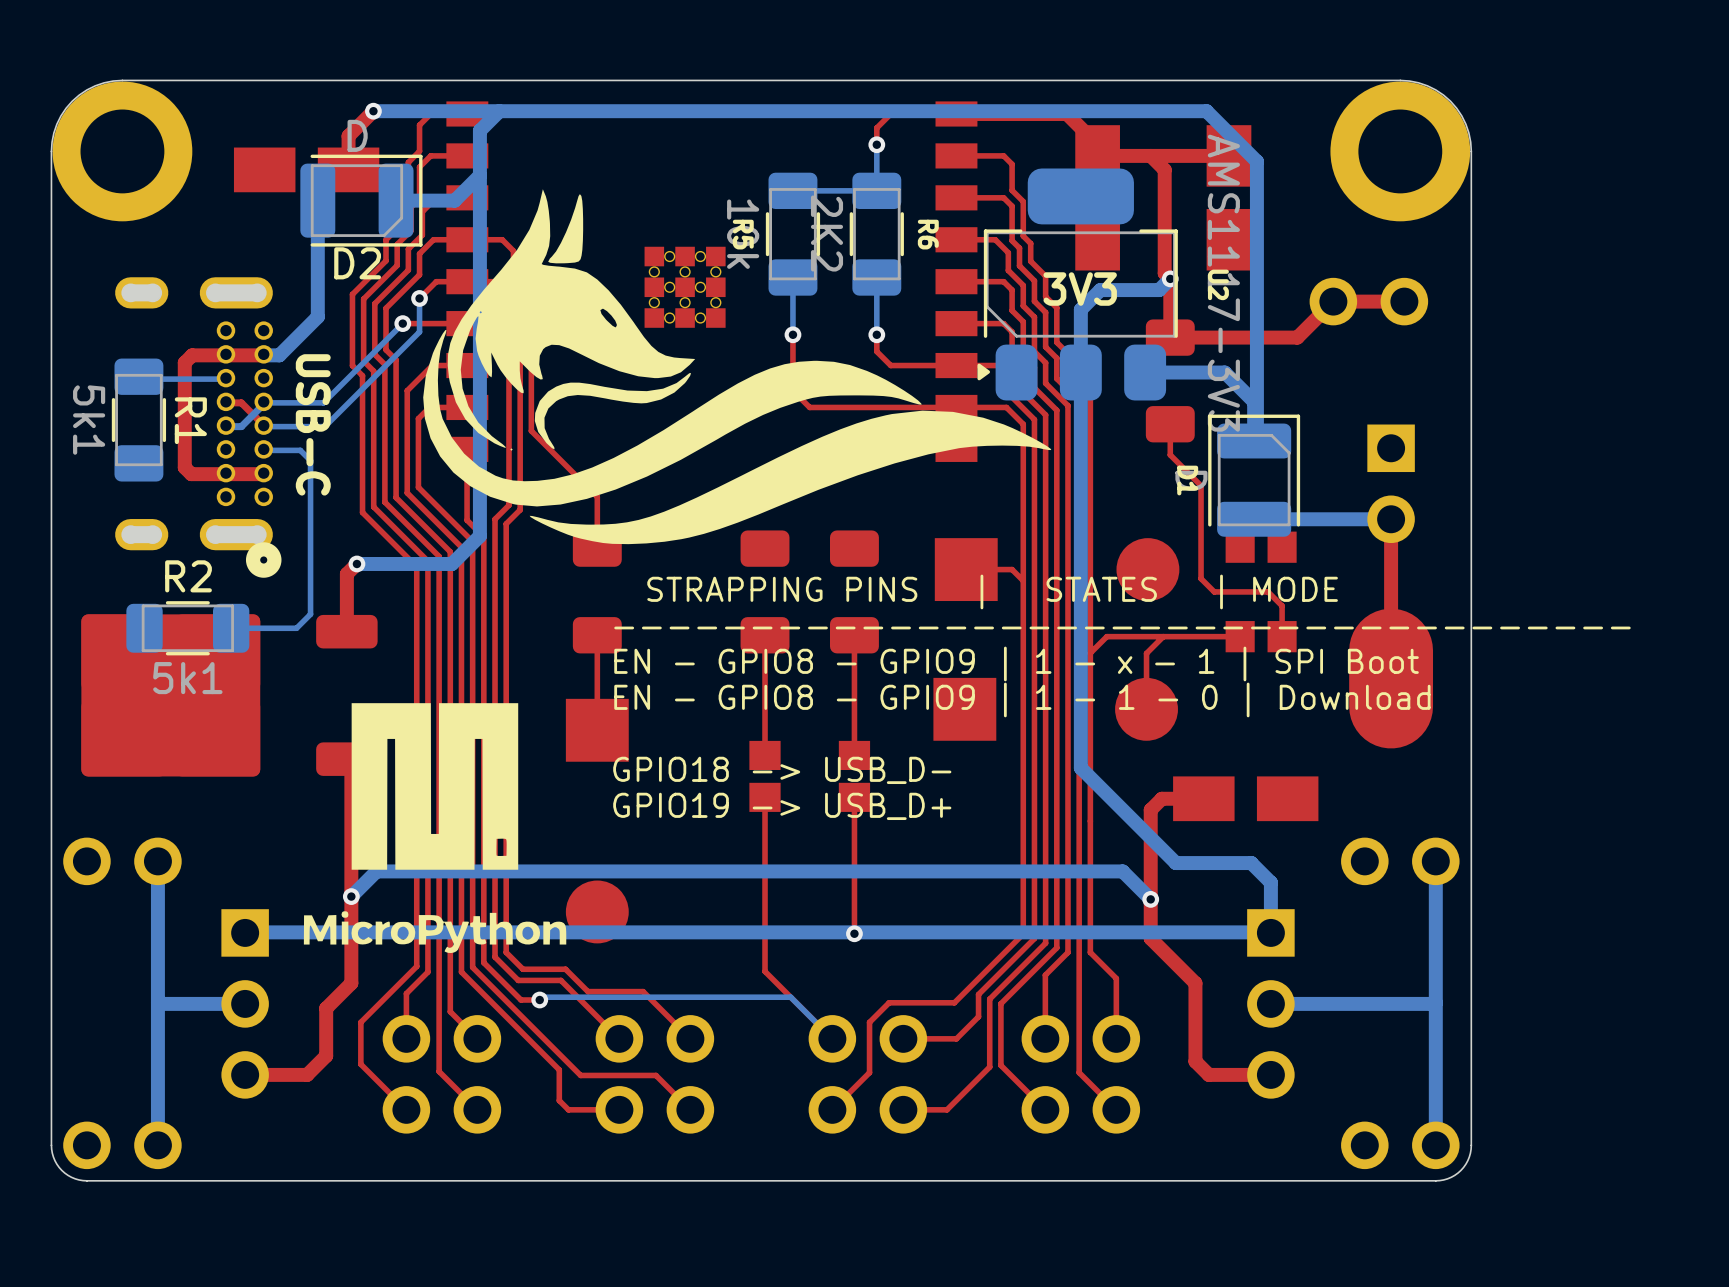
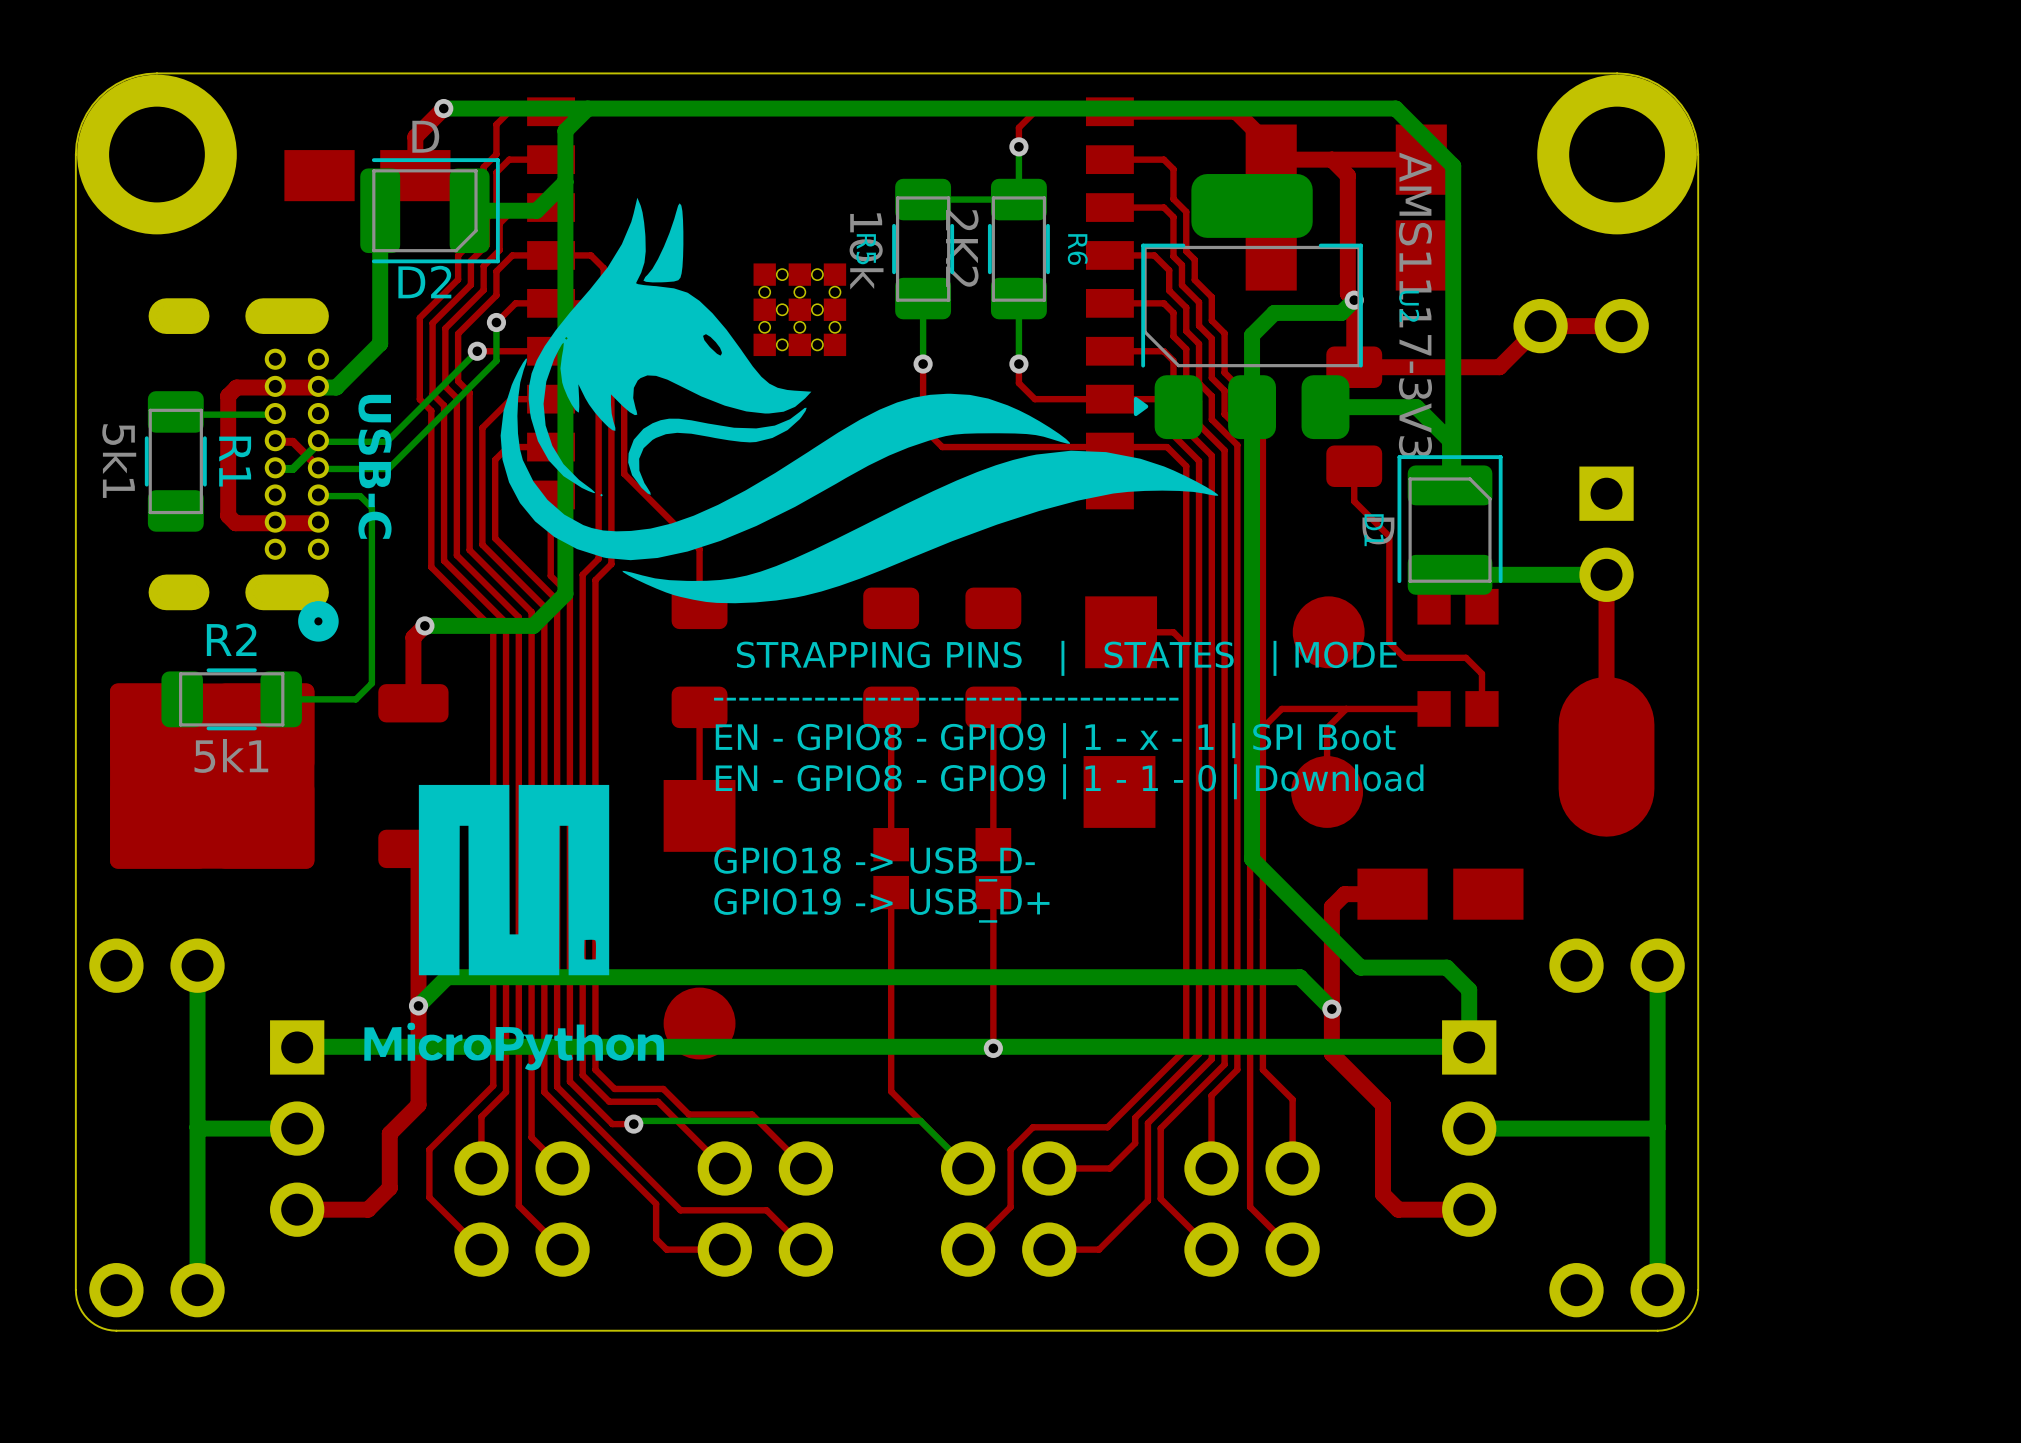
text: 3V3 (1080, 289) -> none

